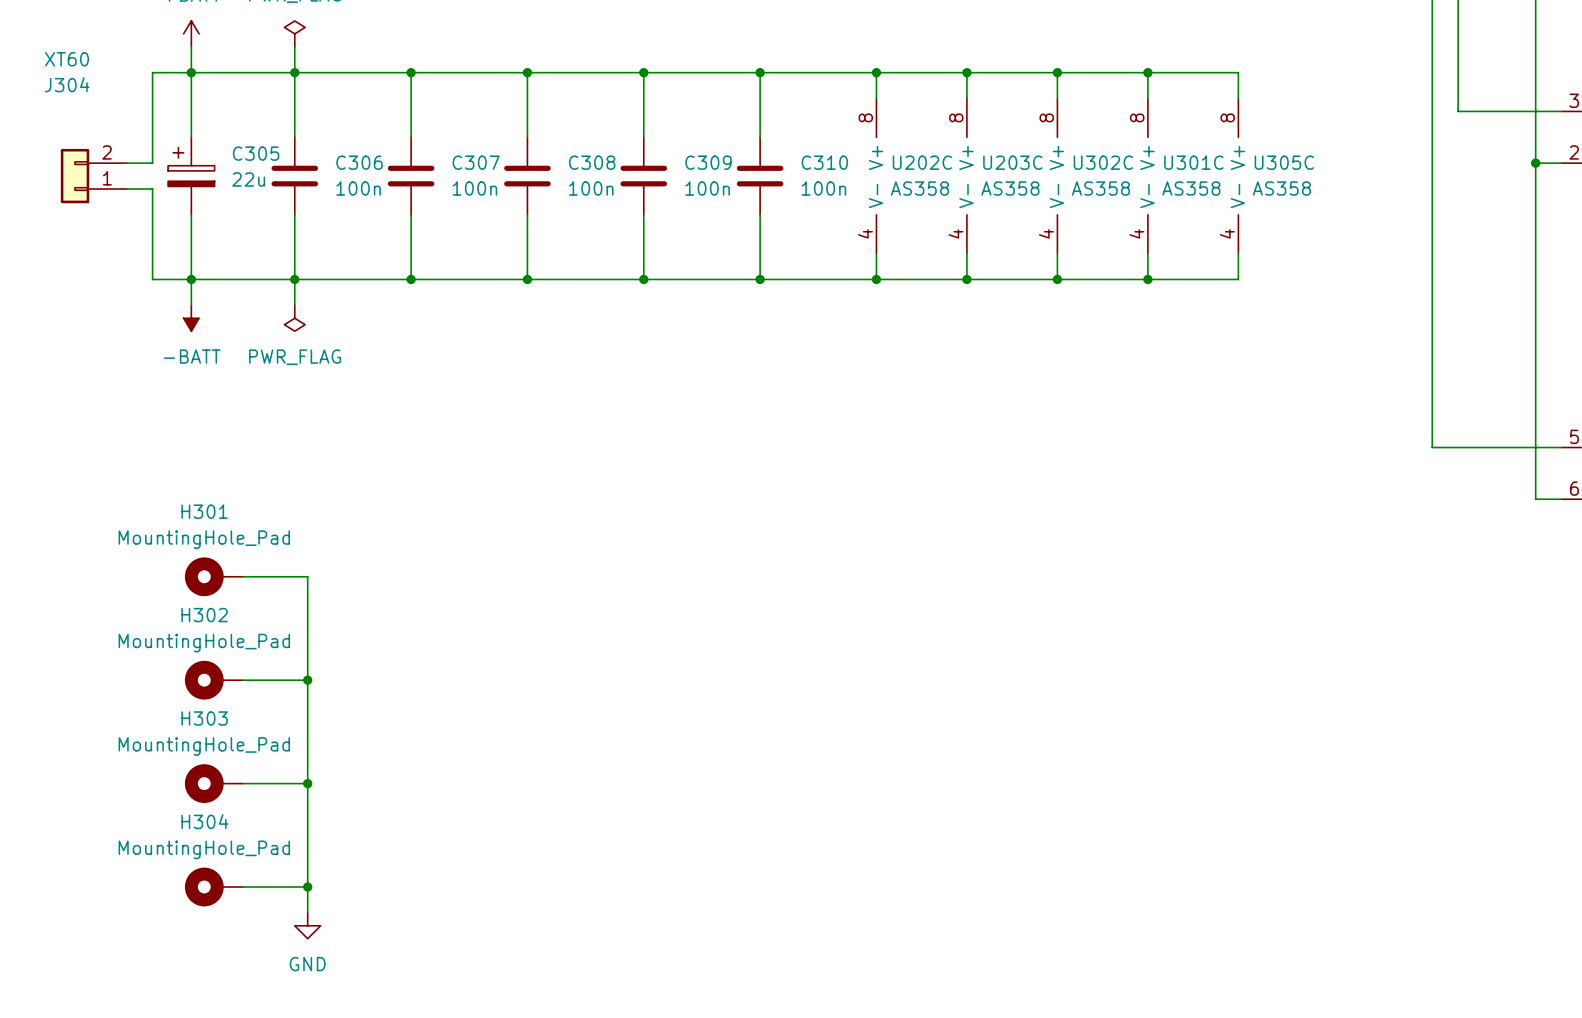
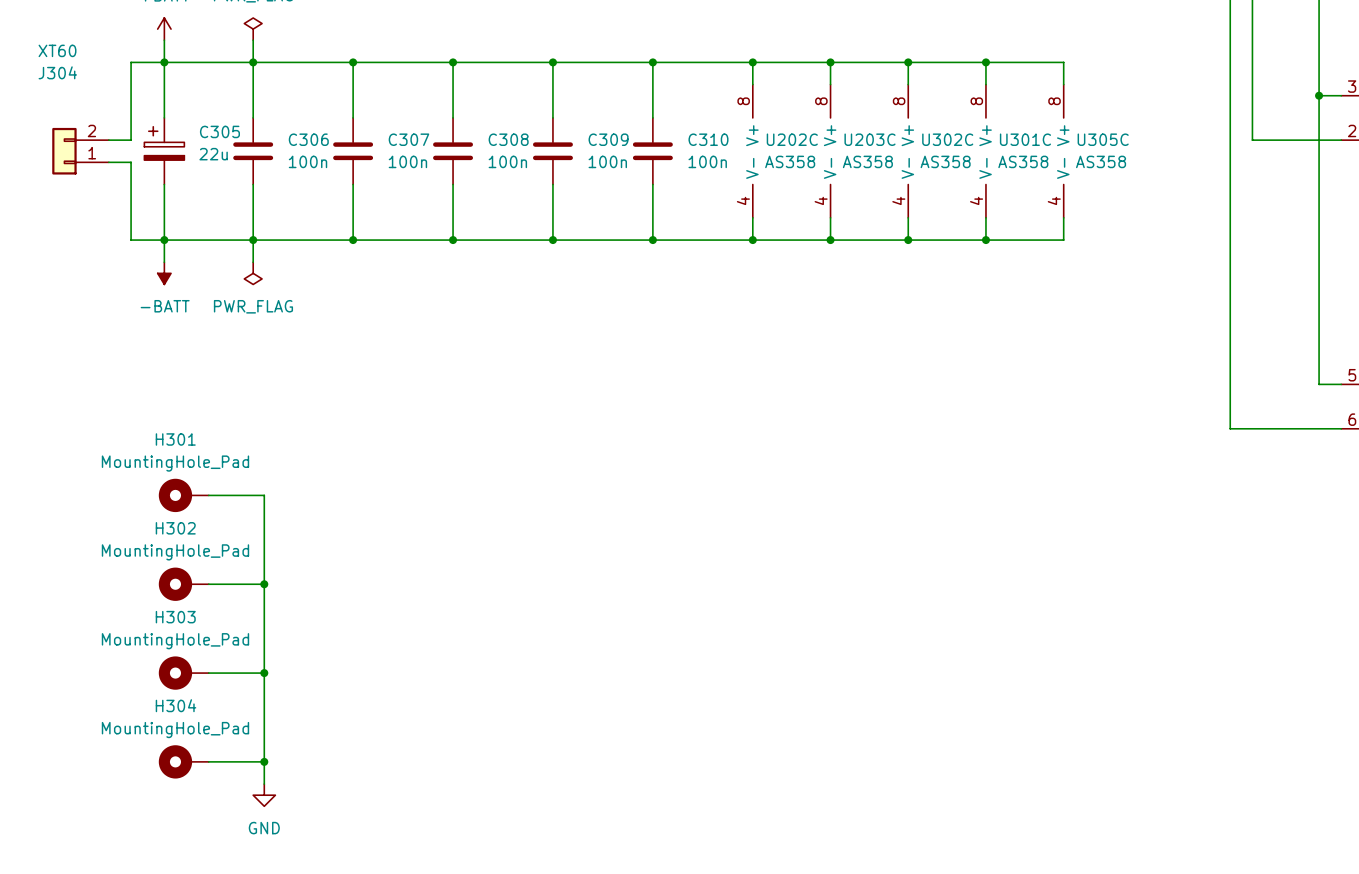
wire: (1458, 111) (1535, 111) -> (1252, 95) (1252, 140) (1319, 140)
junction position: (1535, 163) -> (1319, 95)
wire: (1432, 447) (1535, 447) (1535, 499) -> (1230, 384) (1230, 428) (1319, 428)

